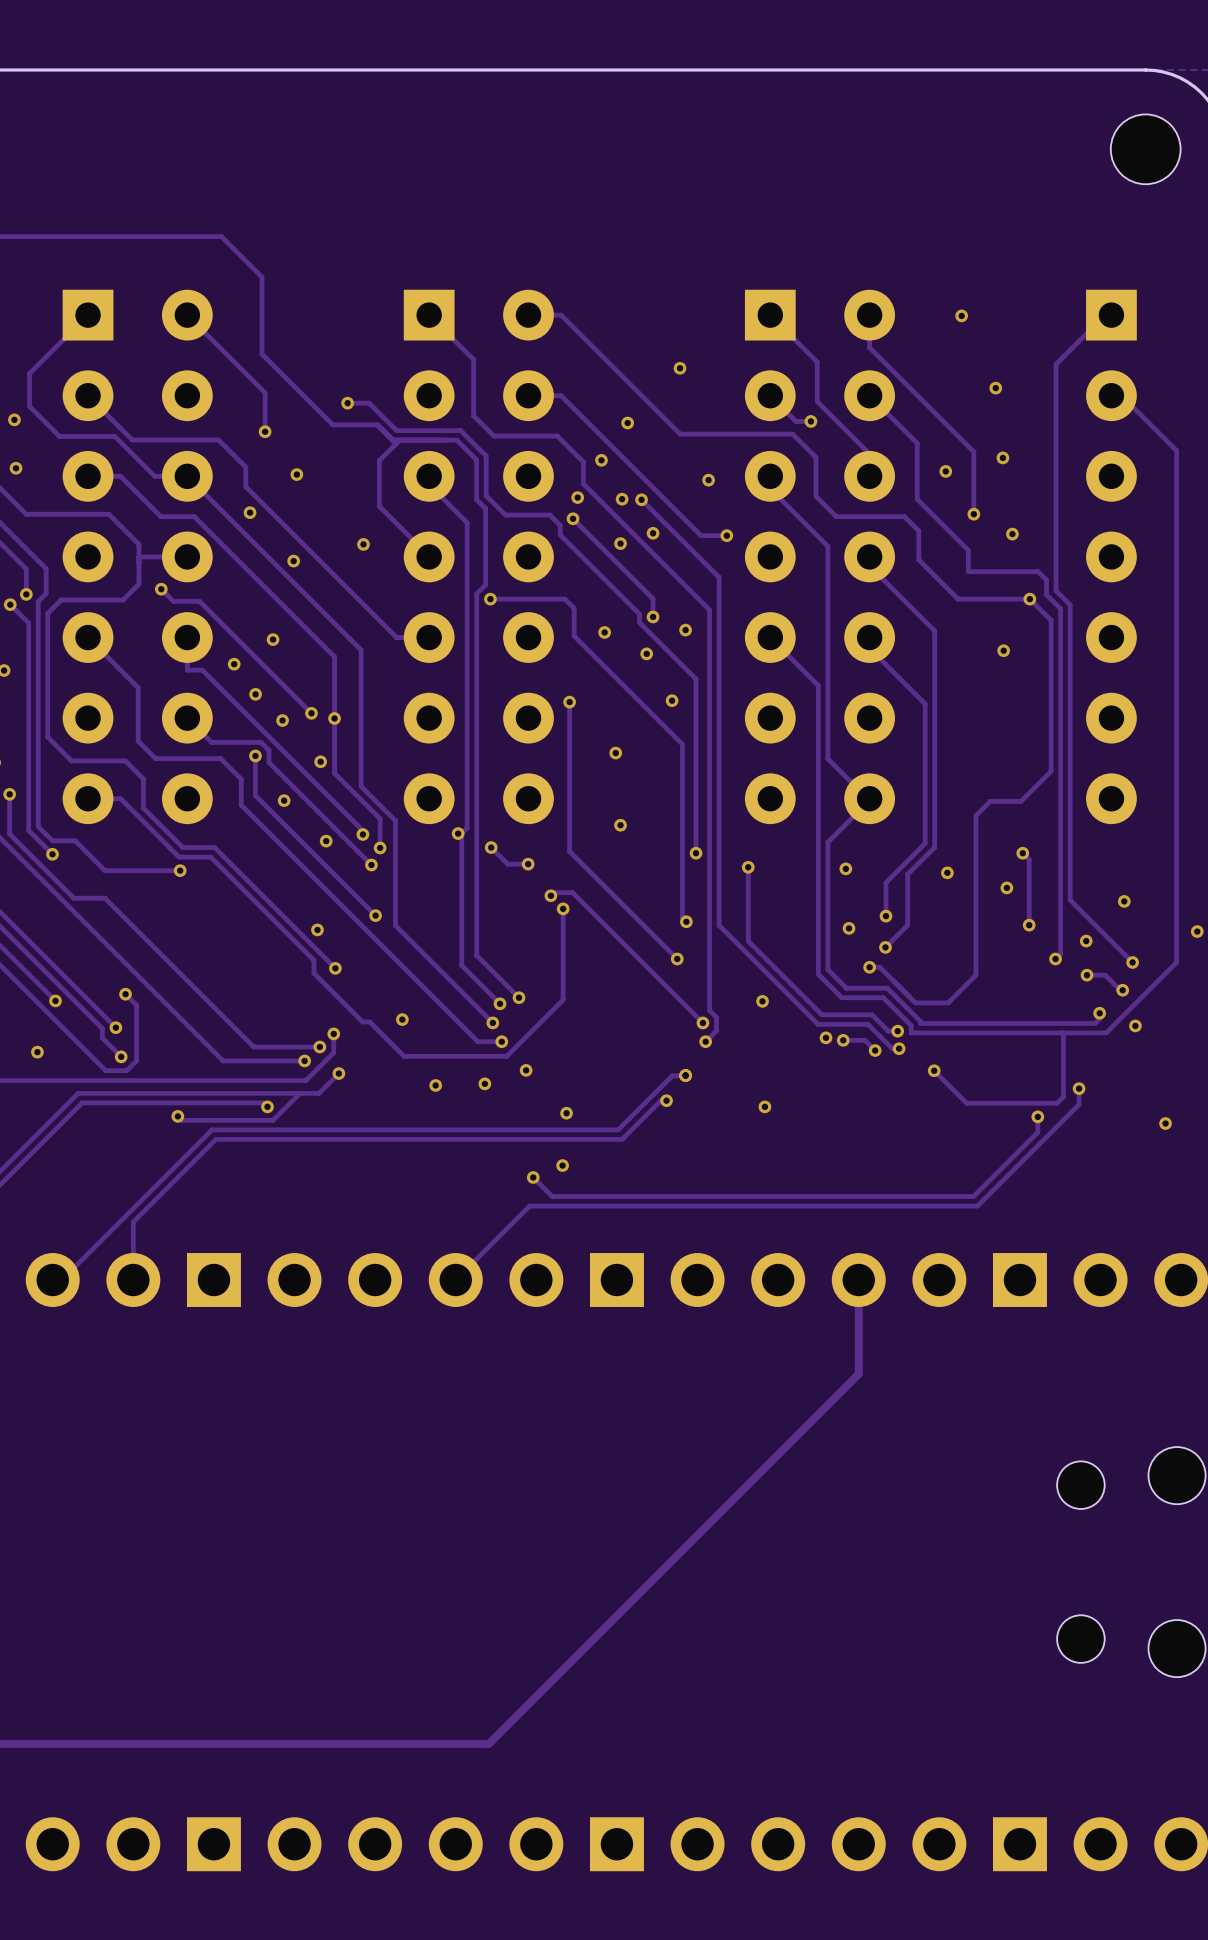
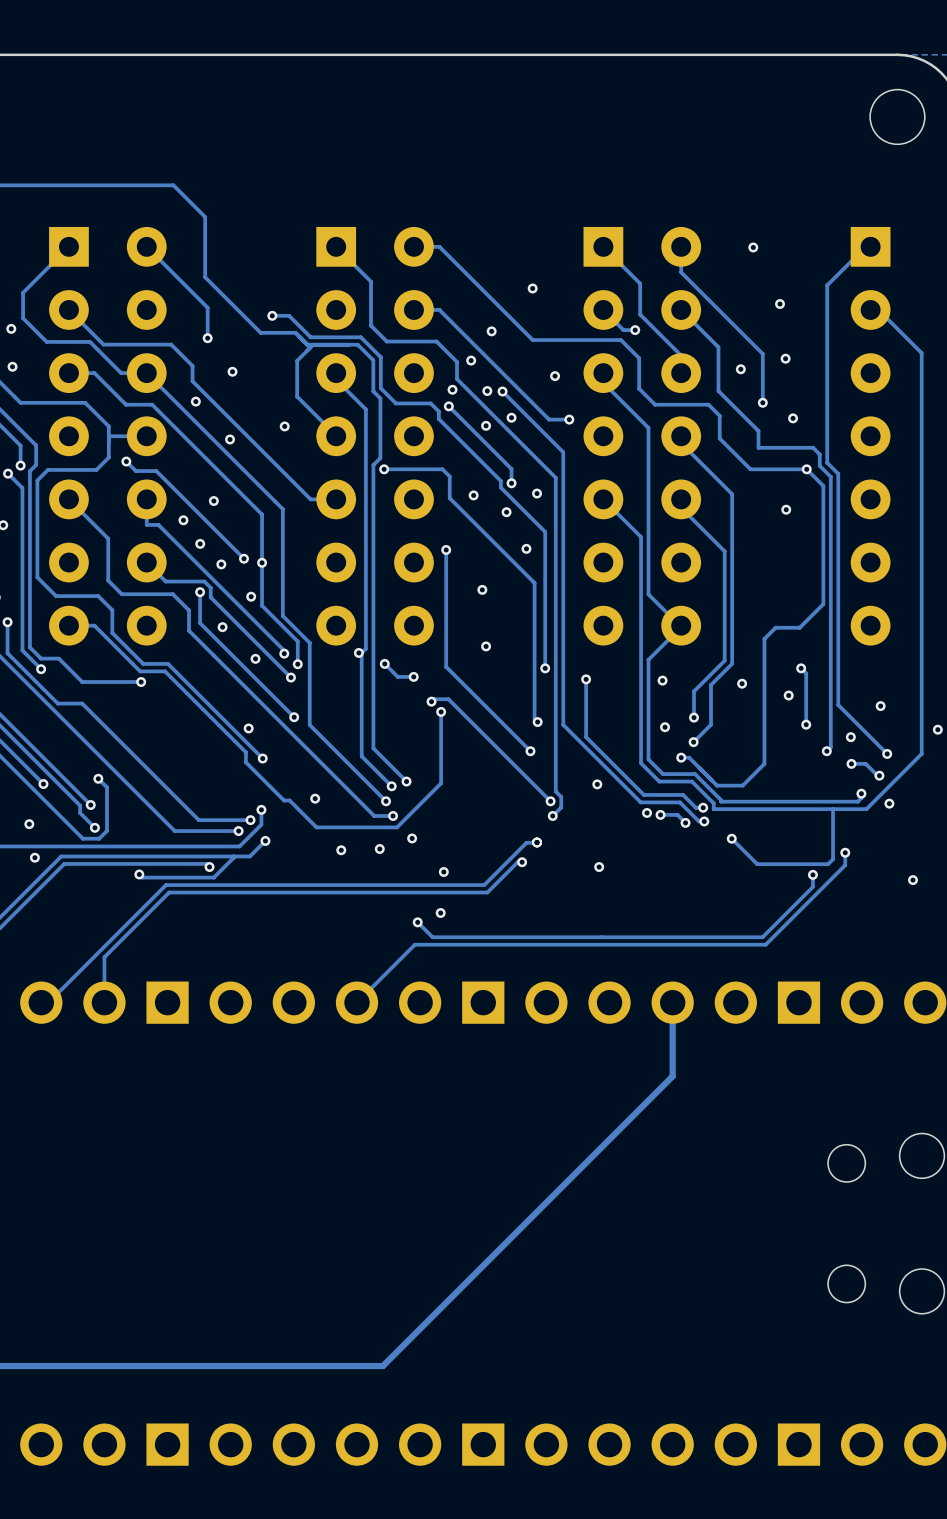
via: none -> (34, 857)

